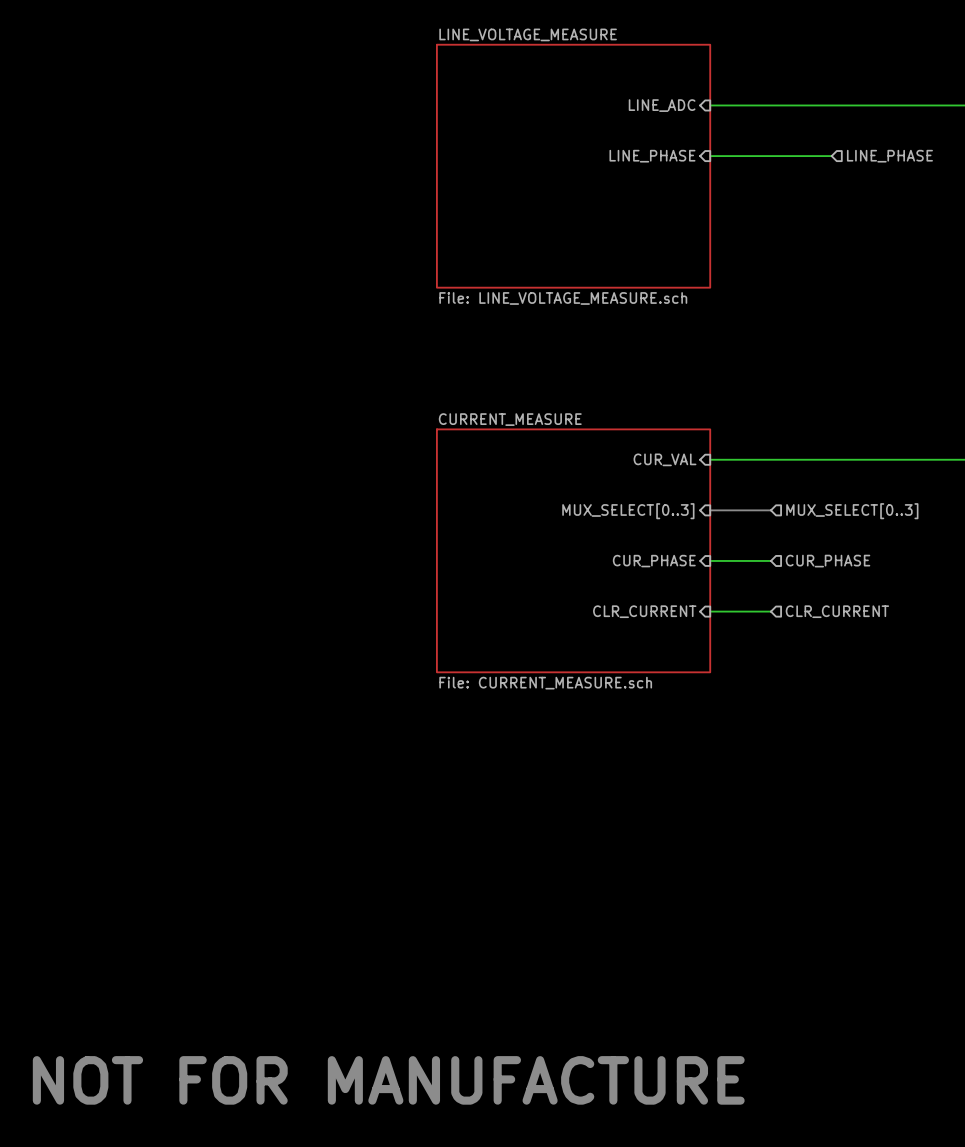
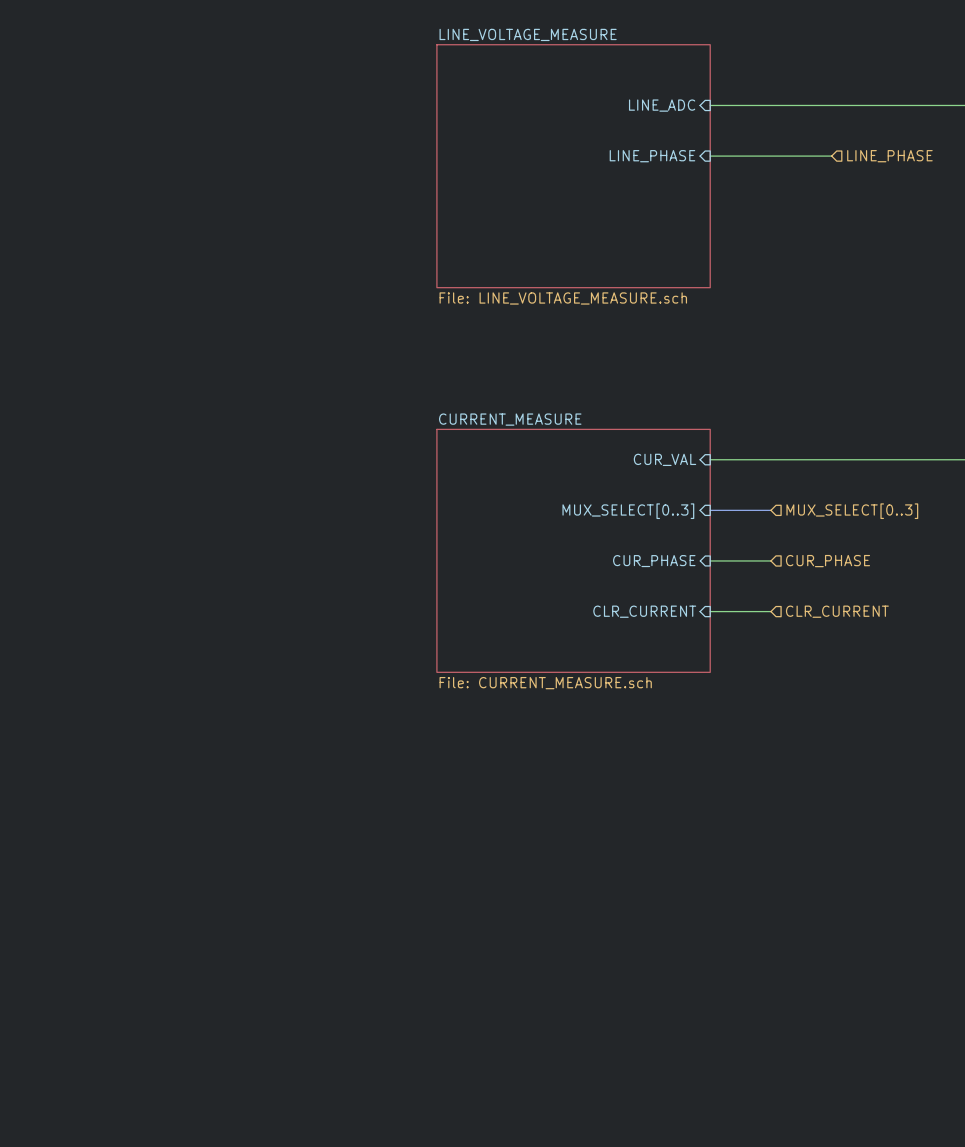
text: NOT FOR MANUFACTURE (388, 1080) -> none

